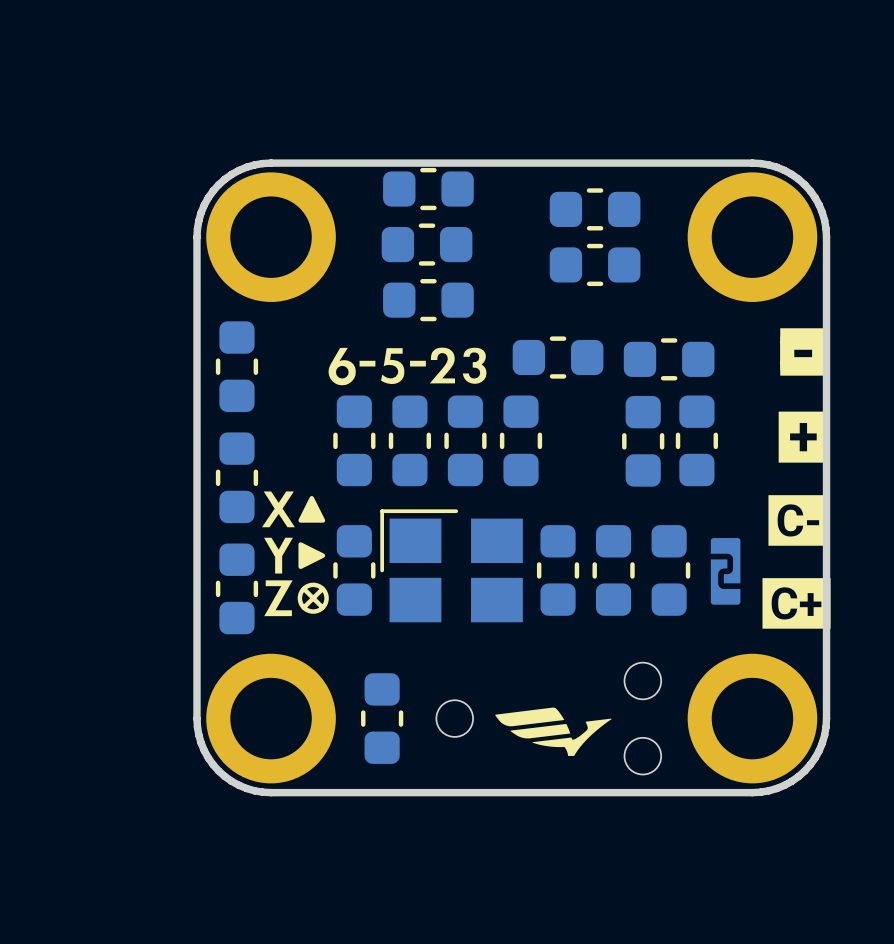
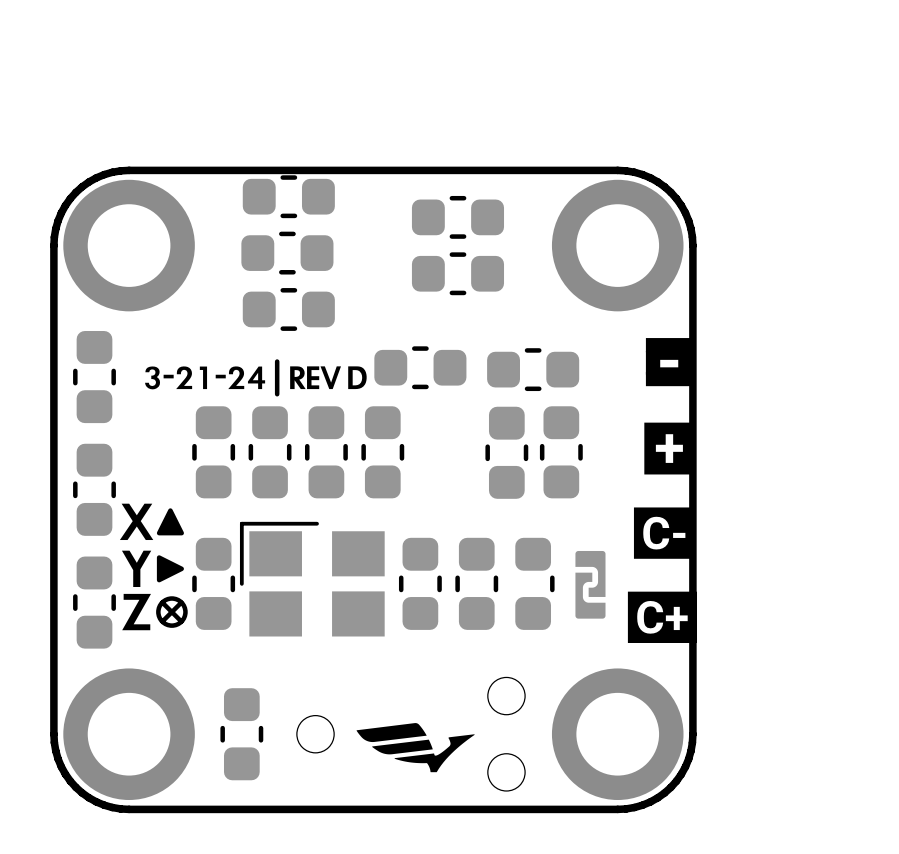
drawing shape: [328, 347, 487, 386] -> [145, 366, 367, 390]
line: none -> (277, 361) (277, 394)

